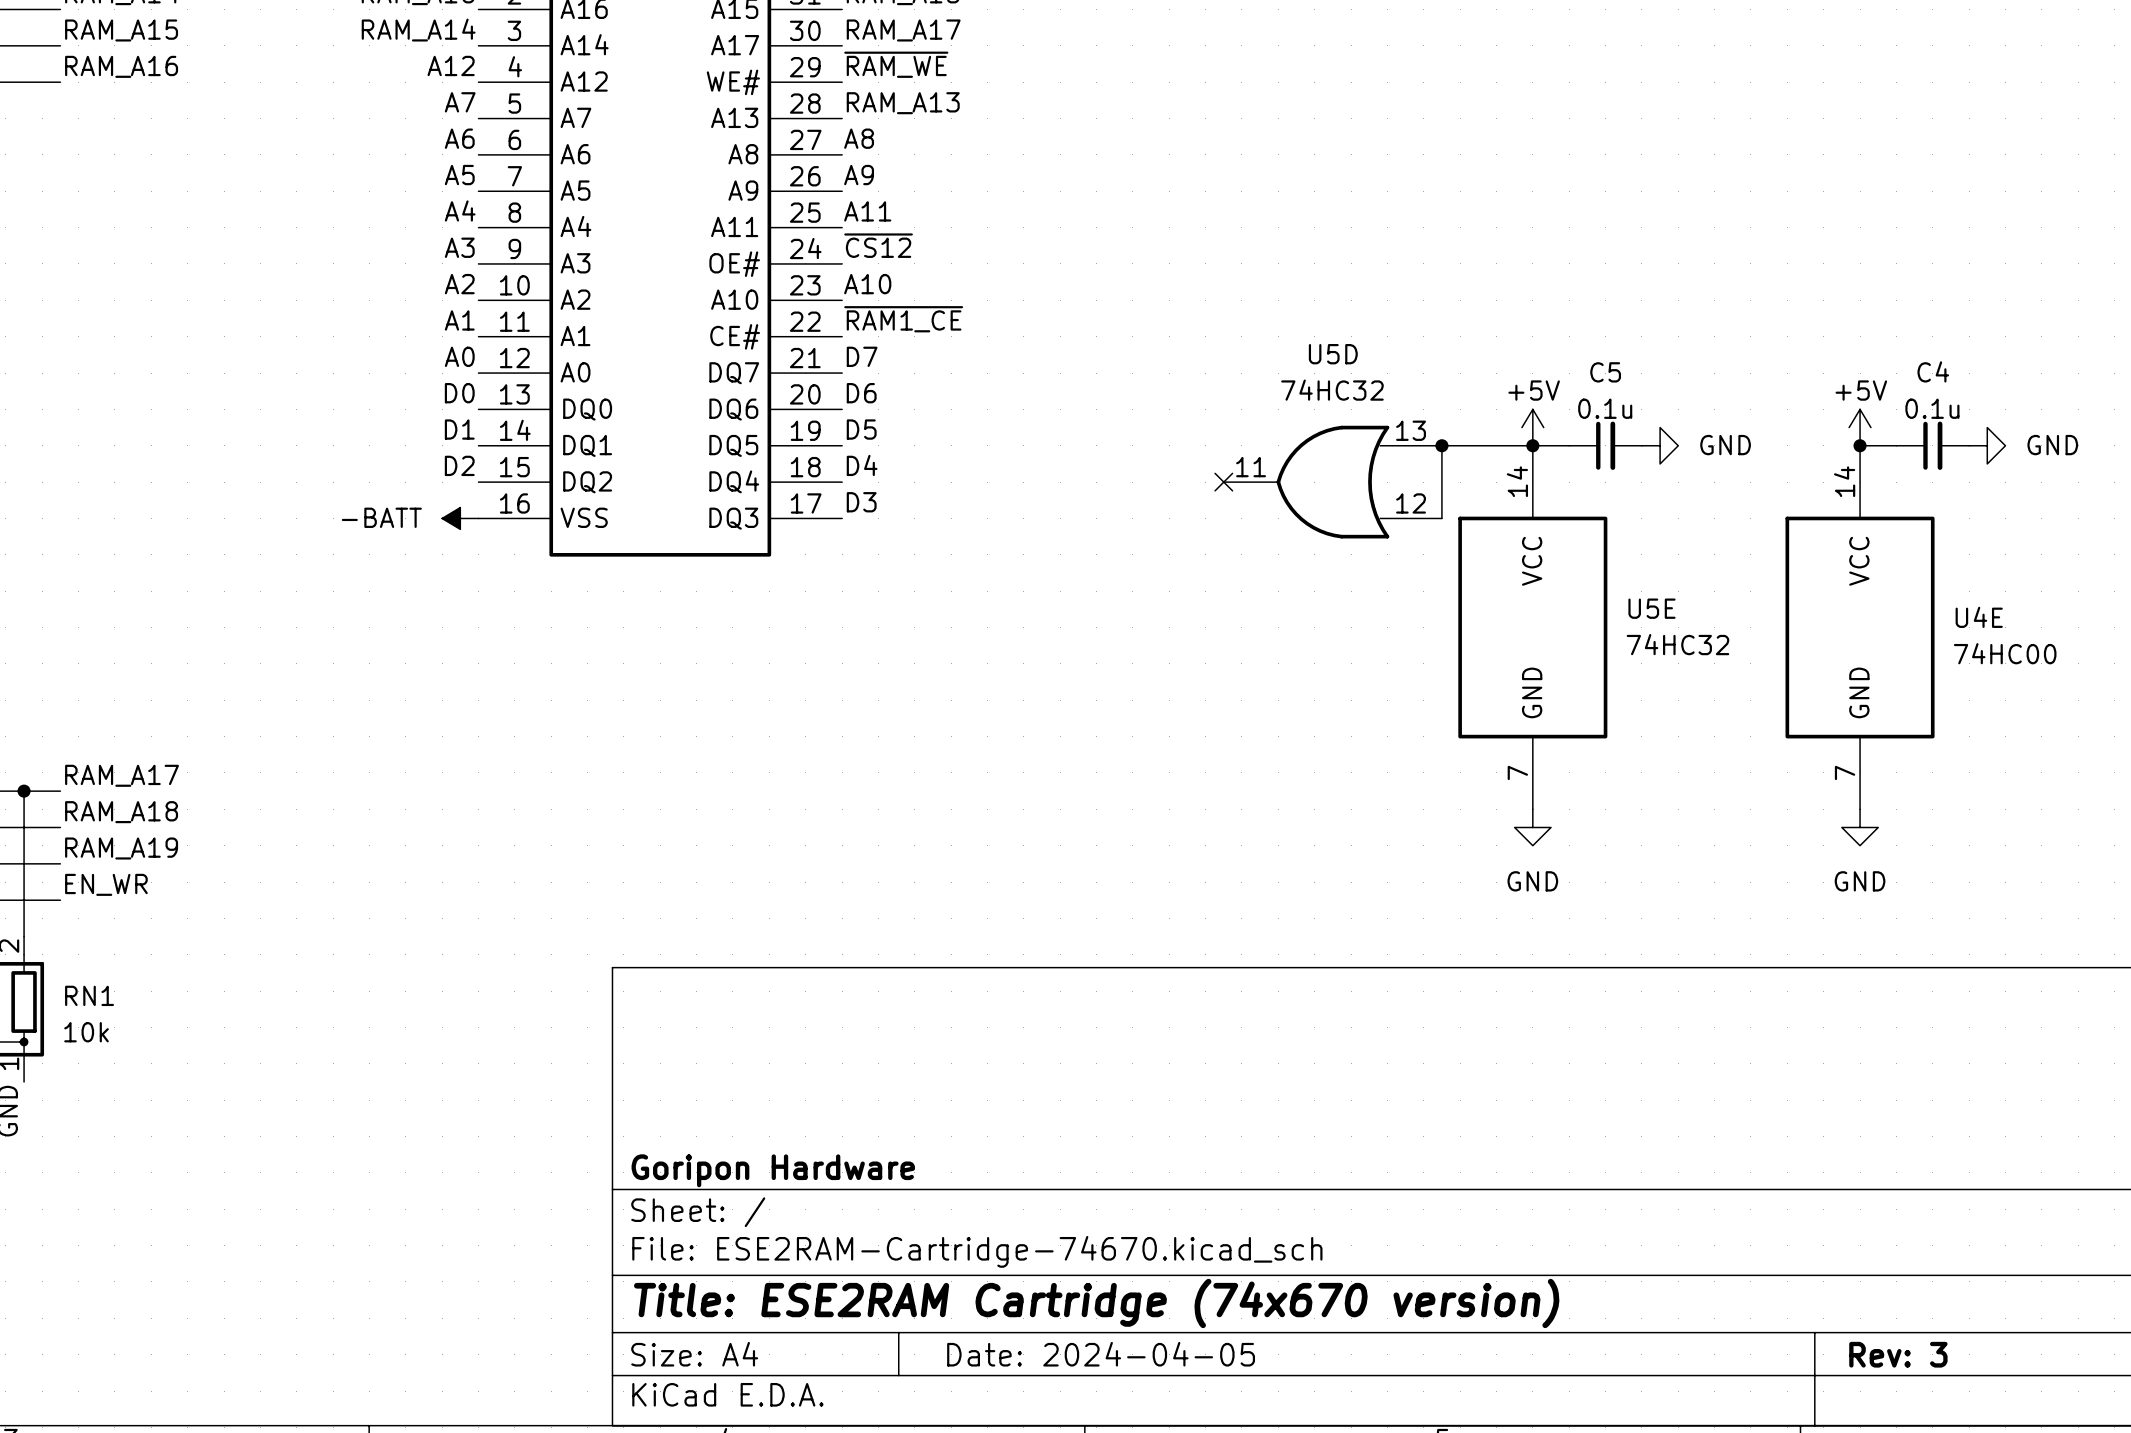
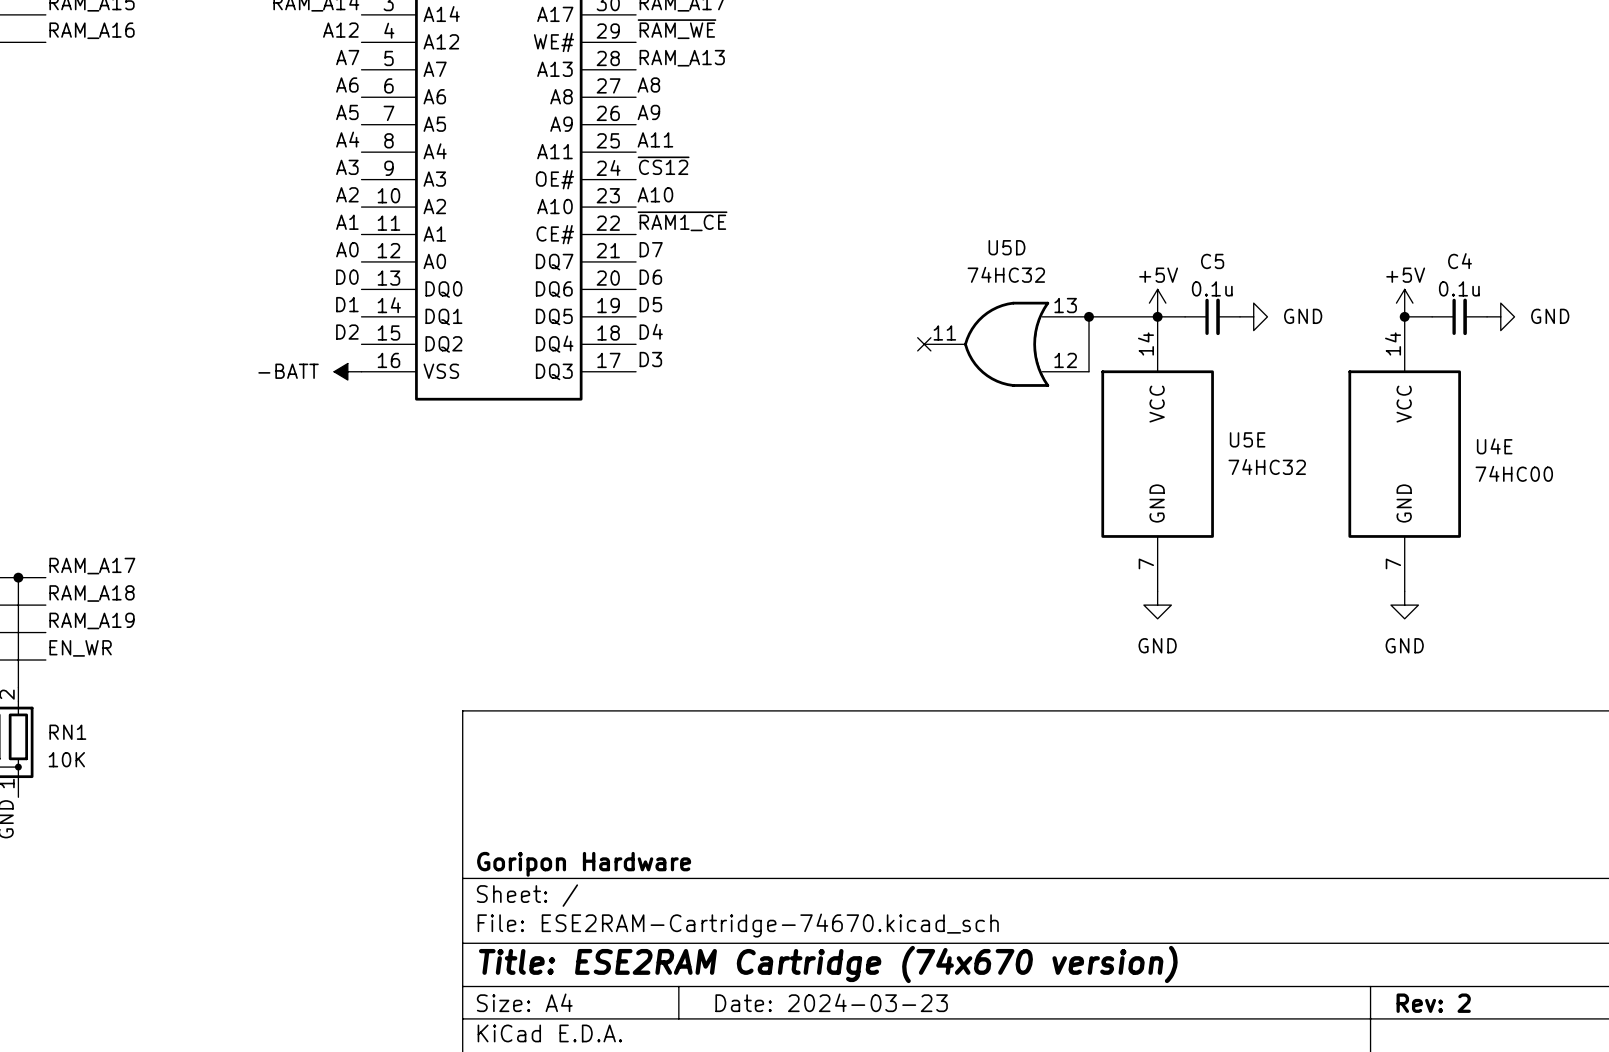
RN1 value: 10k (86, 1032) -> 10K (66, 759)
title block: Date: 2024-04-05 (1101, 1354) -> Date: 2024-03-23 (831, 1002)
title block: Rev: 3 (1898, 1354) -> Rev: 2 (1433, 1003)

